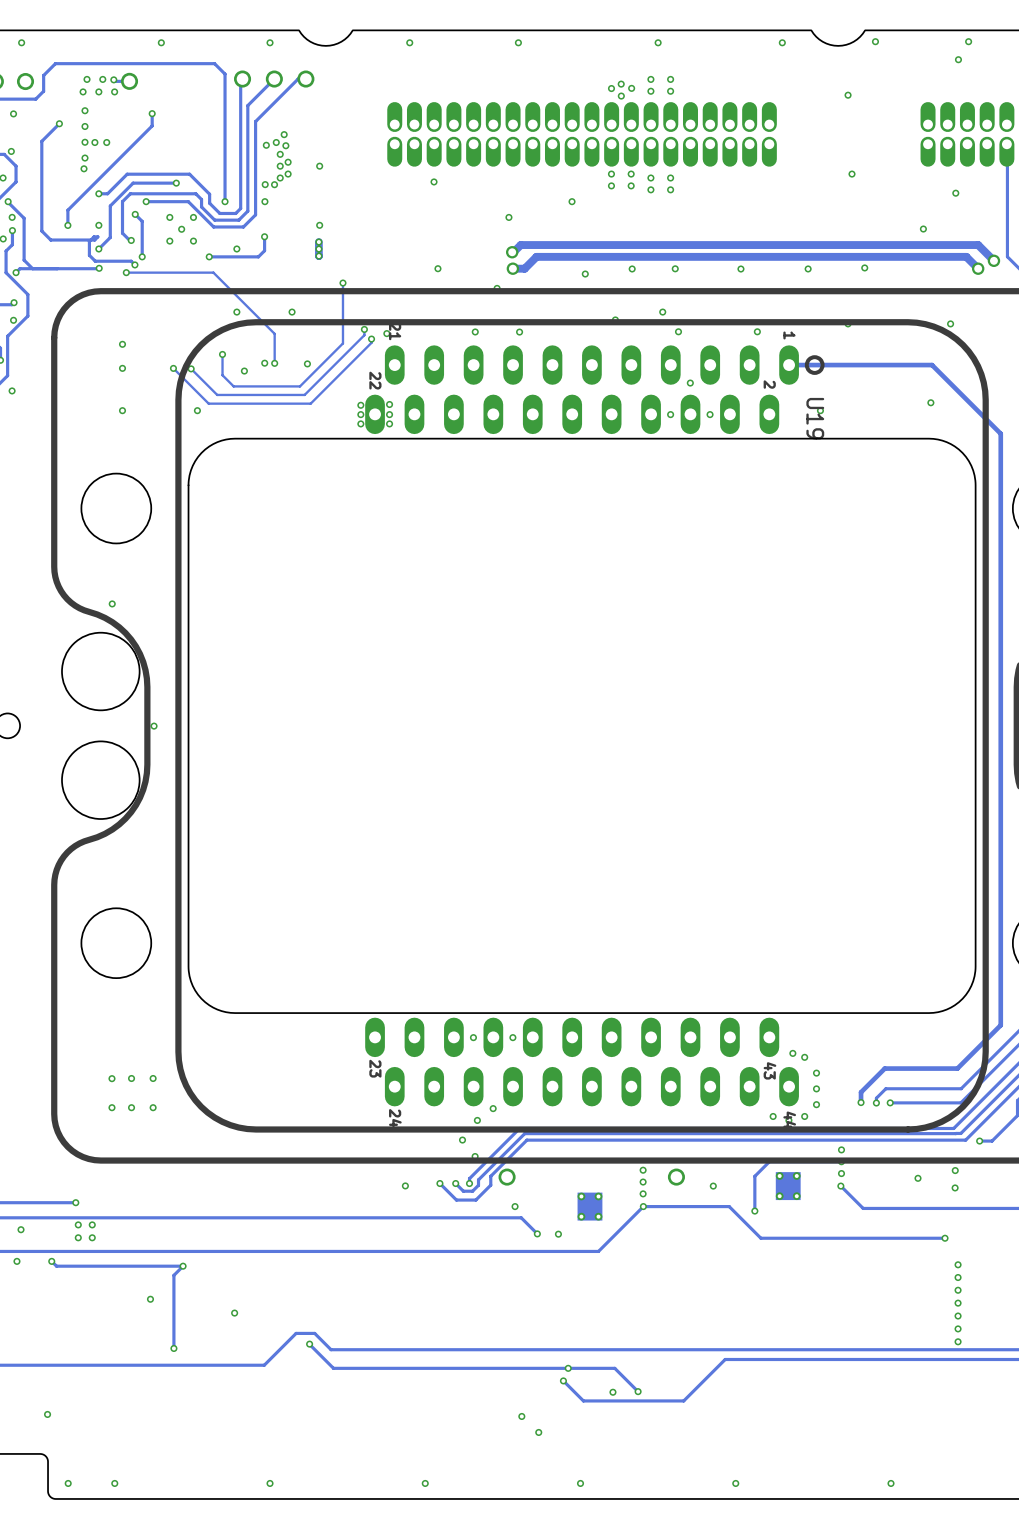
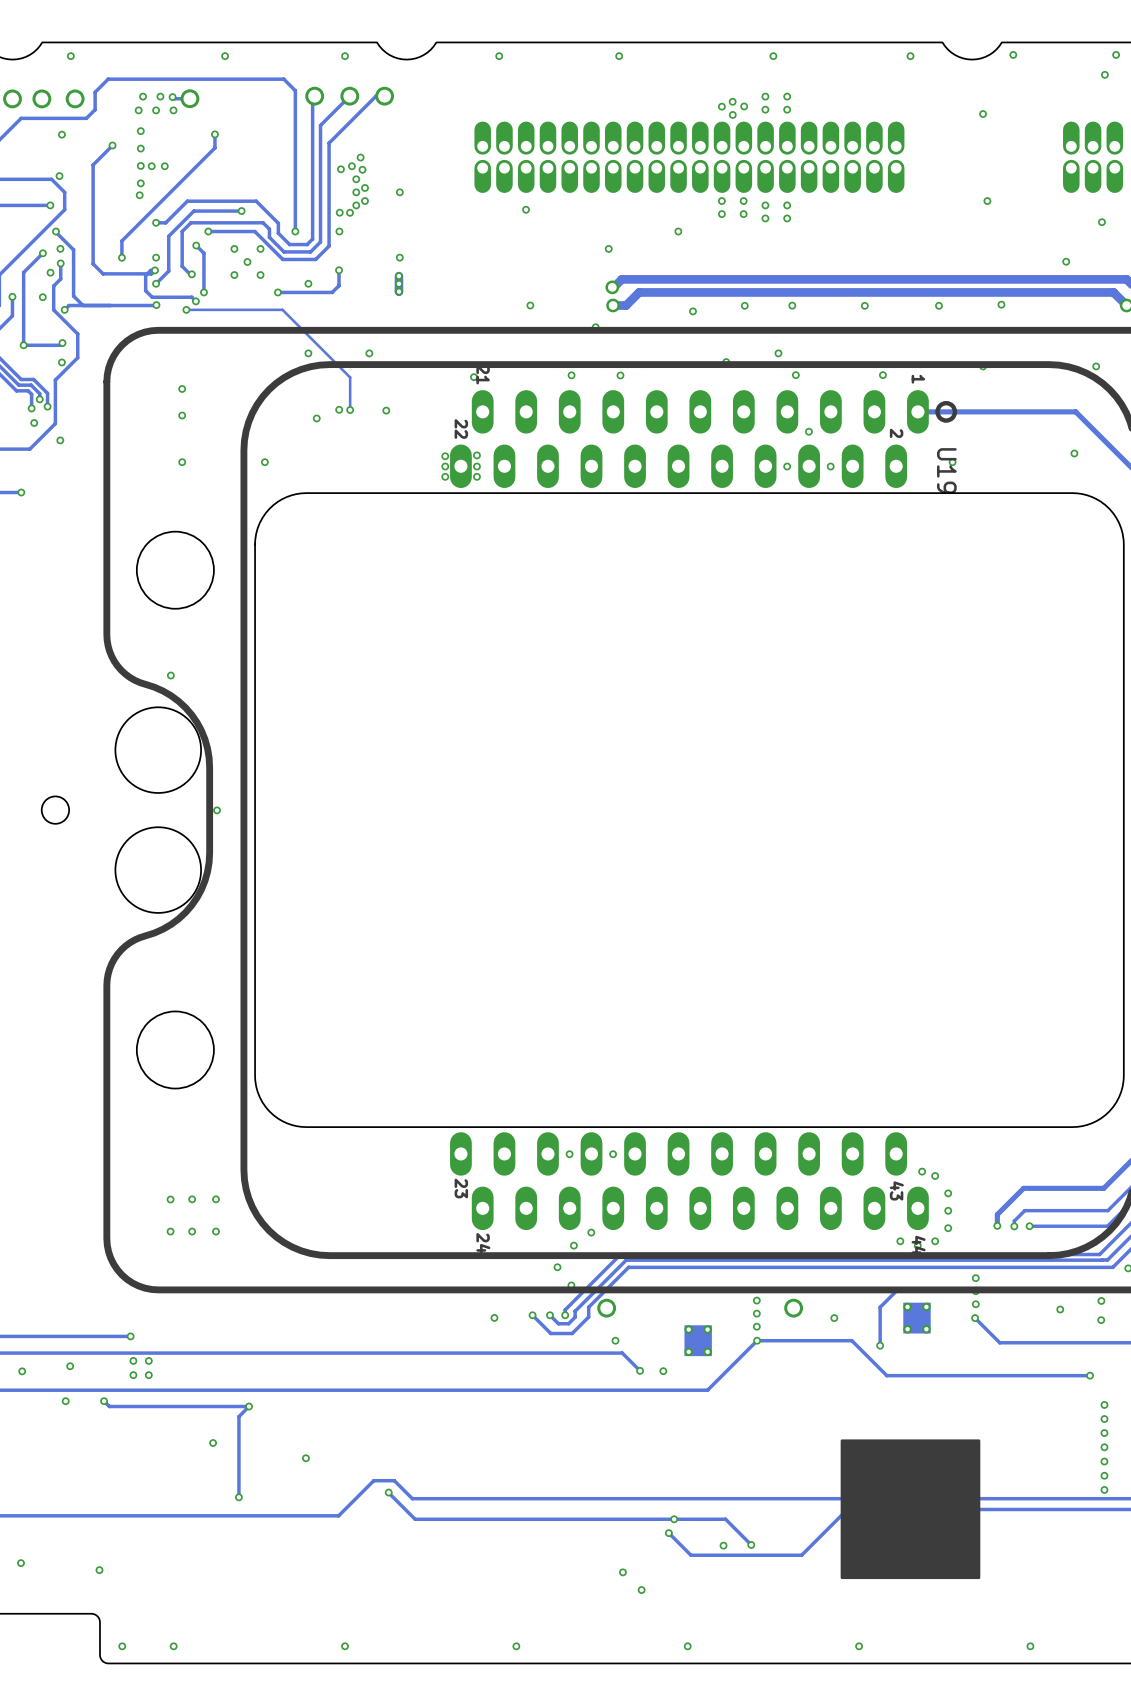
via: none -> (154, 270)
track: (342, 283) (342, 343) (299, 386) (233, 386) (222, 375) (222, 354) -> none
via: (342, 283) -> none
track: (364, 329) (364, 335) (304, 394) (217, 394) (191, 368) -> none
via: (364, 329) -> none
track: (371, 339) (371, 342) (310, 403) (208, 403) (173, 368) -> none
via: (371, 339) -> none
via: (222, 354) -> none
via: (173, 368) -> none
via: (191, 368) -> none
drawing: none -> [840, 1439, 981, 1580]

